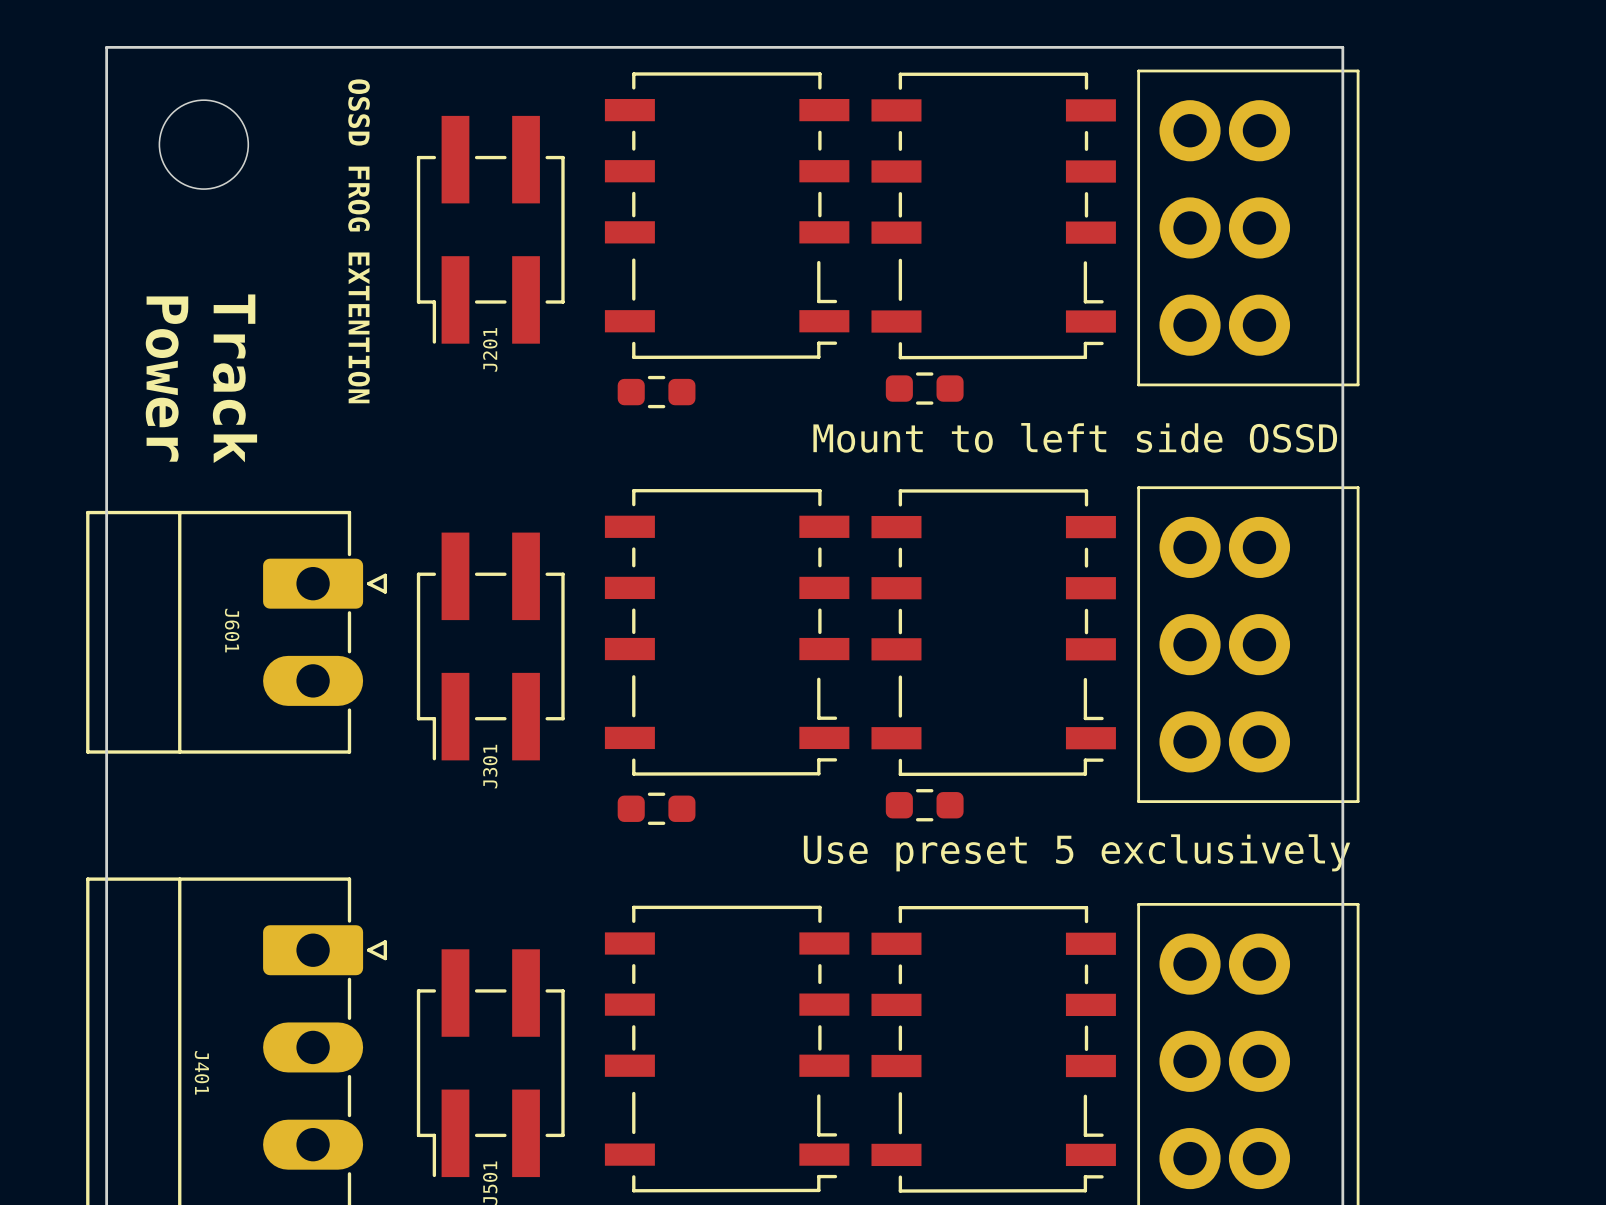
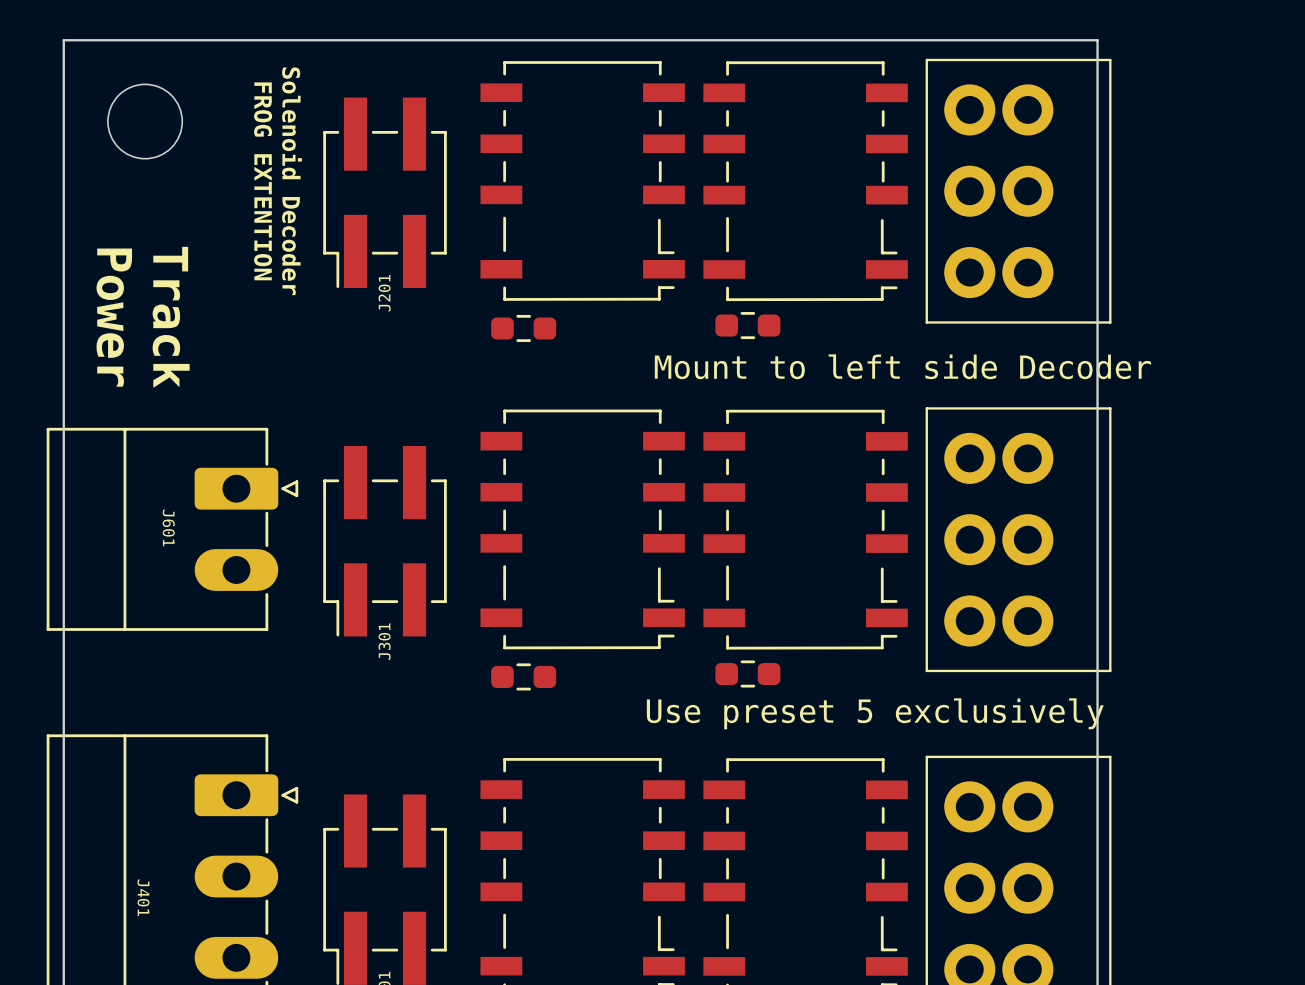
text: none -> Solenoid Decoder (291, 181)
text: OSSD FROG EXTENTION (359, 241) -> FROG EXTENTION (263, 181)
text: Mount to left side OSSD (1075, 437) -> Mount to left side Decoder (902, 366)

